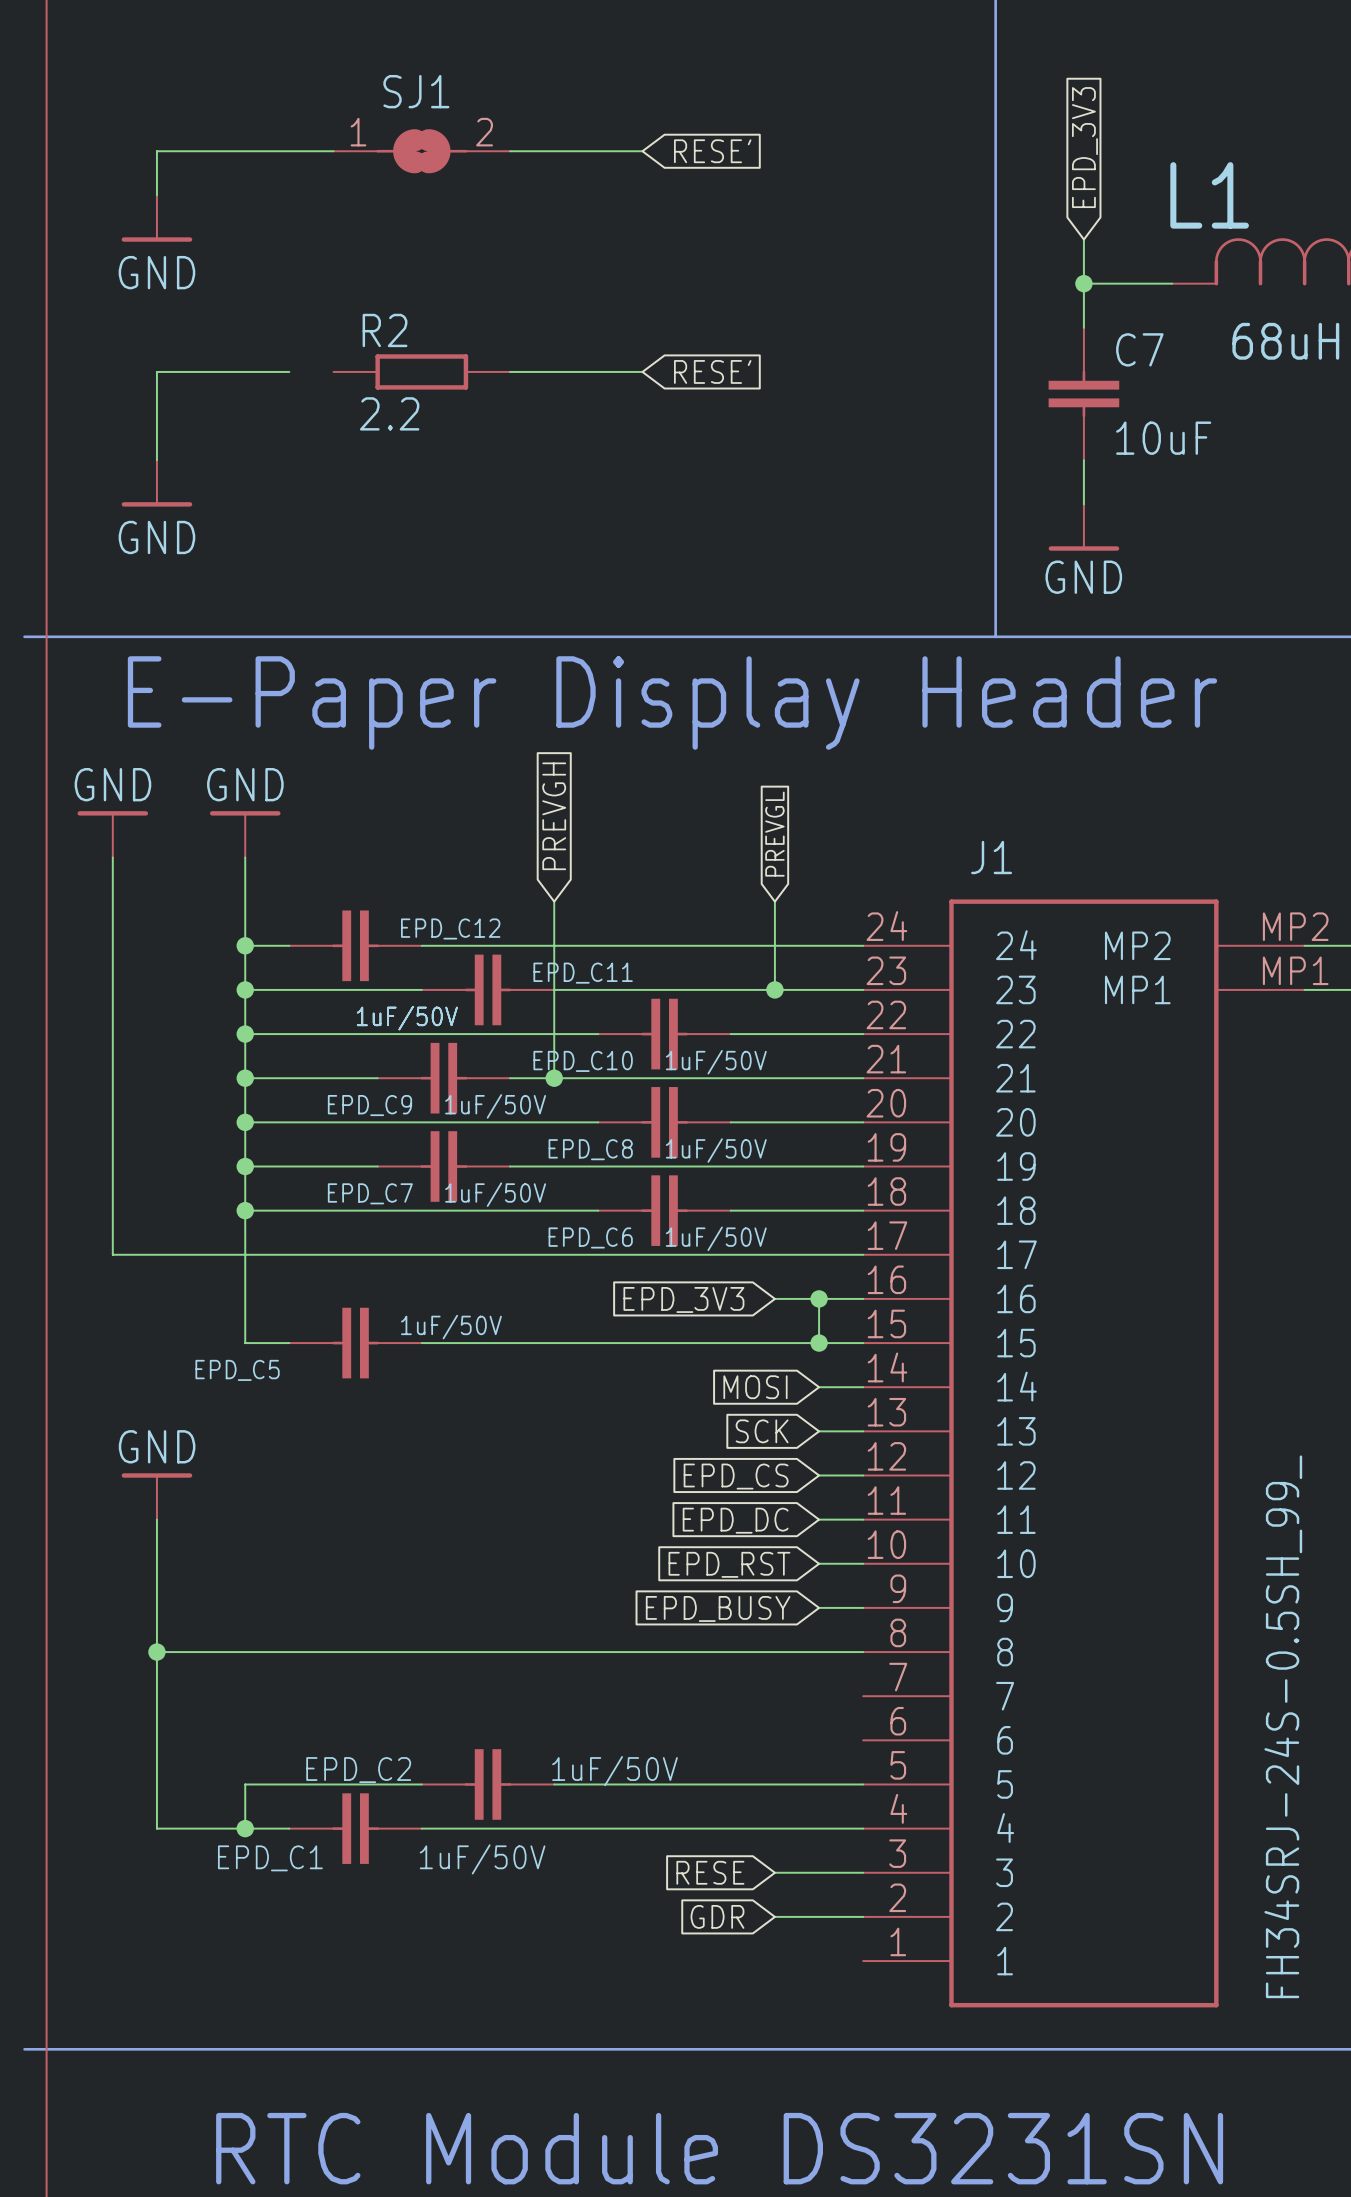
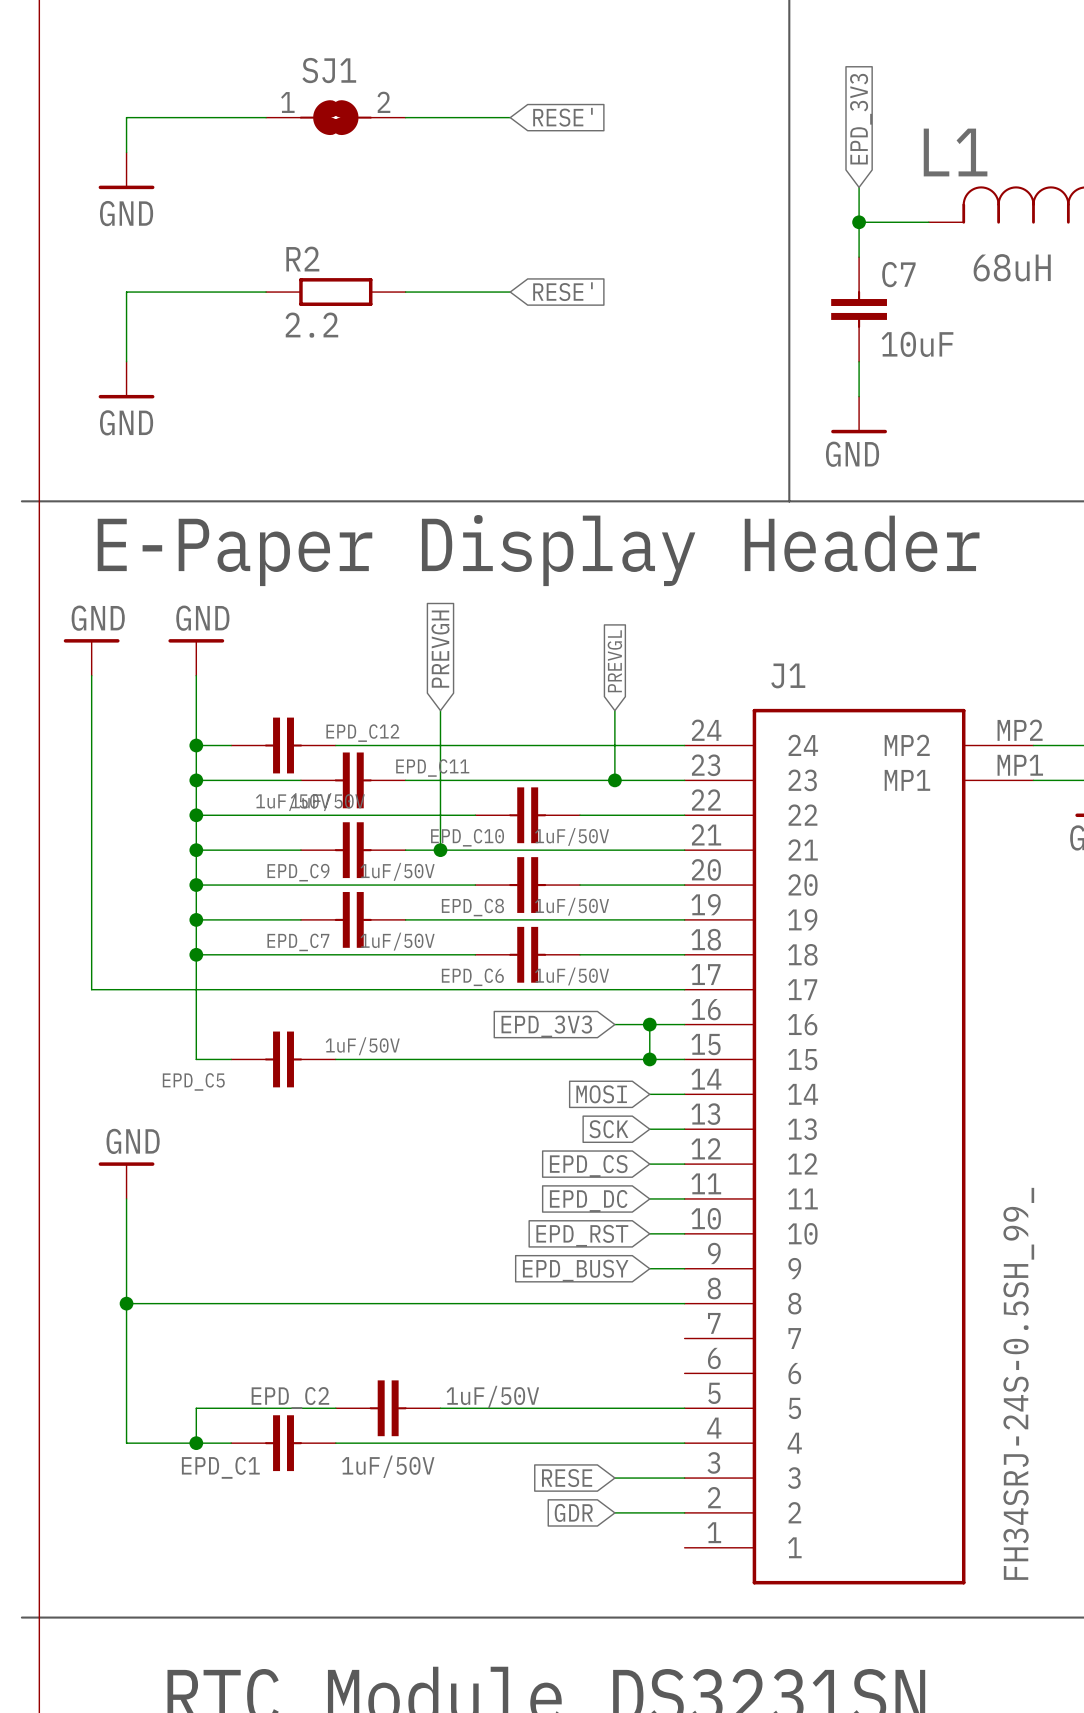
wire: none -> (231, 292) (266, 292)
EPD_C11 position: (488, 989) -> (353, 780)

